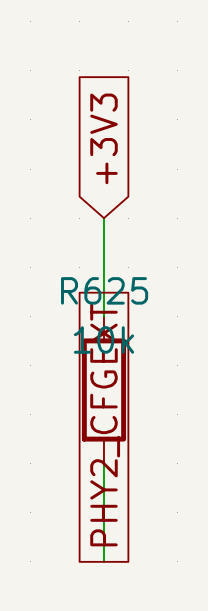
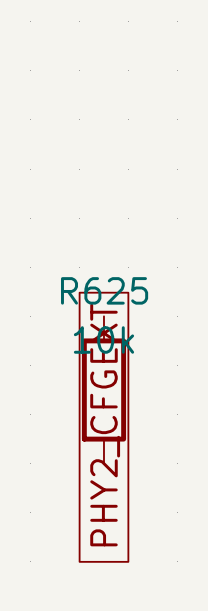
global label: +3V3 (103, 138) -> none
wire: (103, 218) (103, 316) -> none
wire: (103, 463) (103, 561) -> none

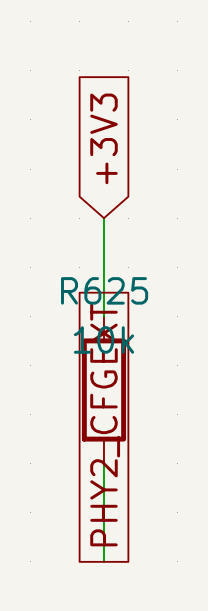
global label: none -> +3V3 (103, 138)
wire: none -> (103, 218) (103, 316)
wire: none -> (103, 463) (103, 561)

